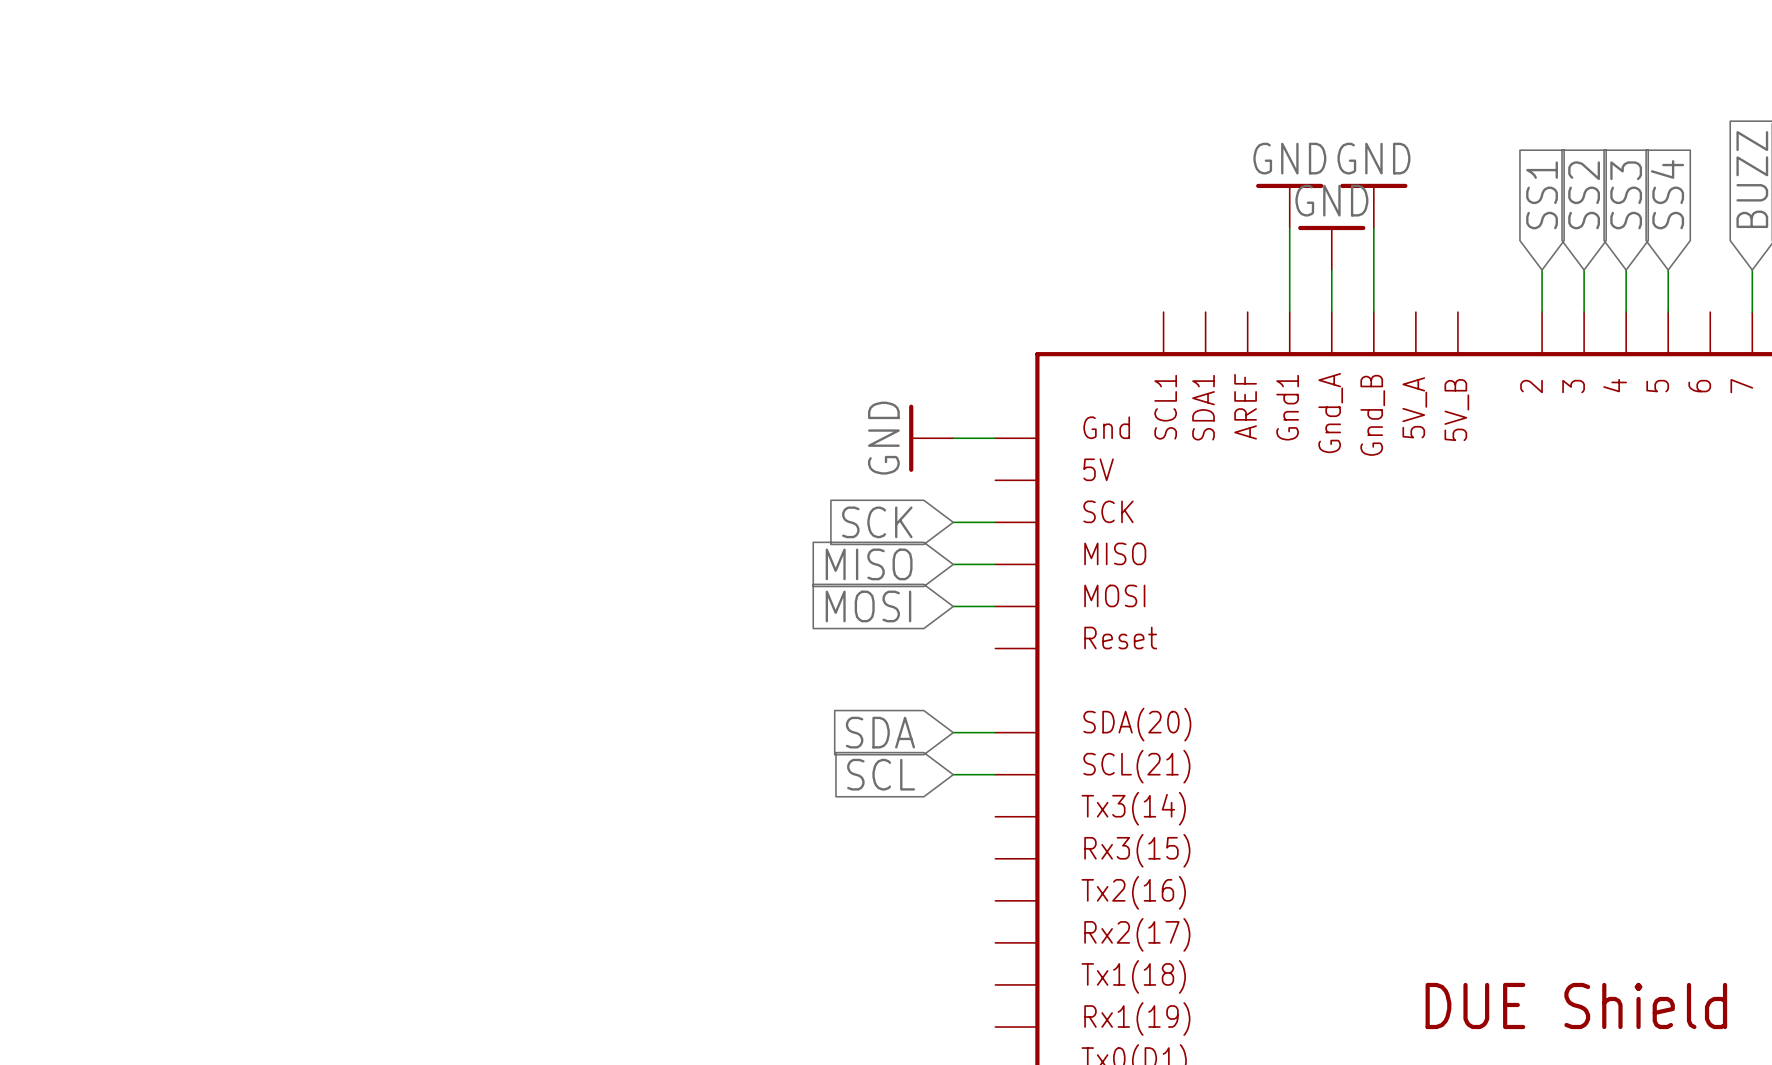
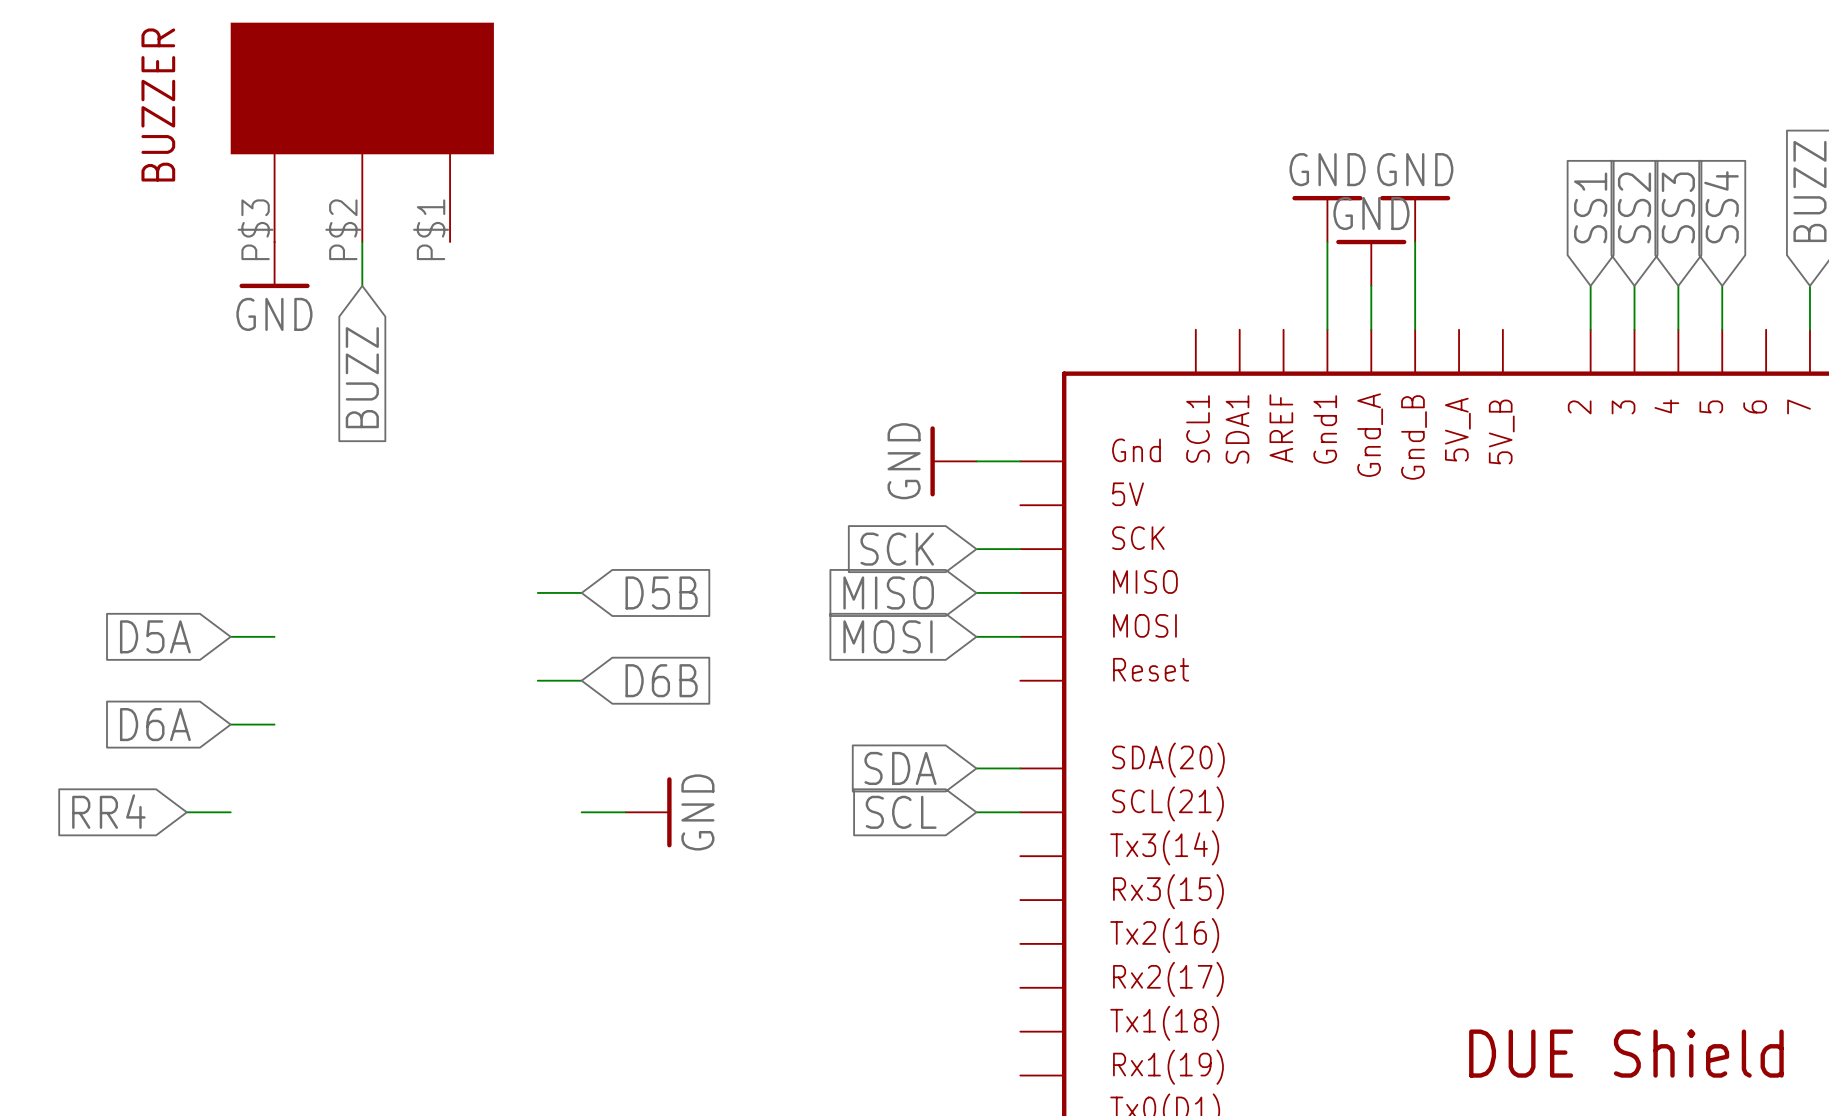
BUZZER: none -> (362, 132)
wire: none -> (362, 242) (362, 285)
power symbol: none -> GND (274, 265)
global label: none -> BUZZ (362, 377)
wire: none -> (537, 592) (581, 592)
global label: none -> D5B (661, 592)
global label: none -> D5A (155, 636)
wire: none -> (230, 636) (274, 636)
wire: none -> (537, 680) (581, 680)
global label: none -> D6B (661, 680)
global label: none -> D6A (155, 724)
wire: none -> (230, 724) (274, 724)
global label: none -> RR4 (108, 811)
wire: none -> (186, 812) (230, 812)
wire: none -> (581, 812) (625, 812)
power symbol: none -> GND (648, 812)

